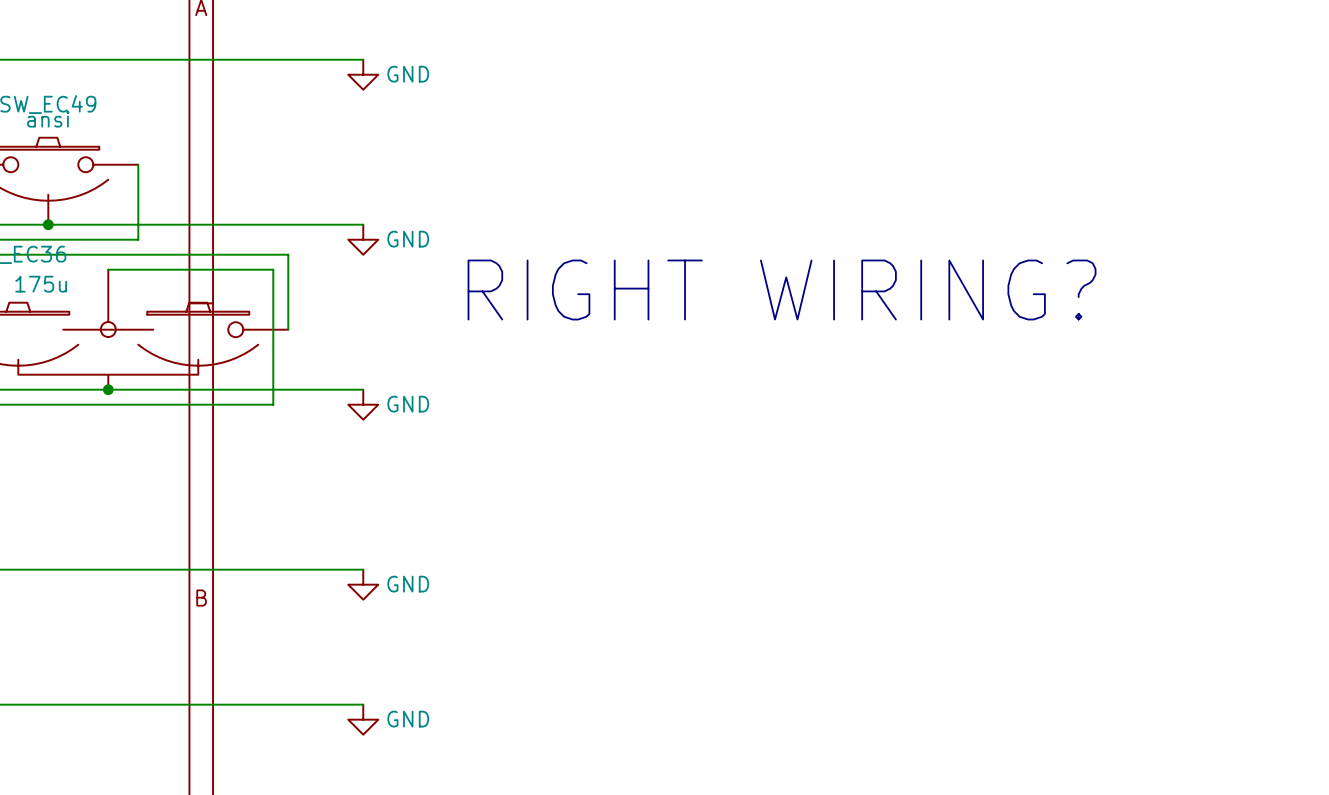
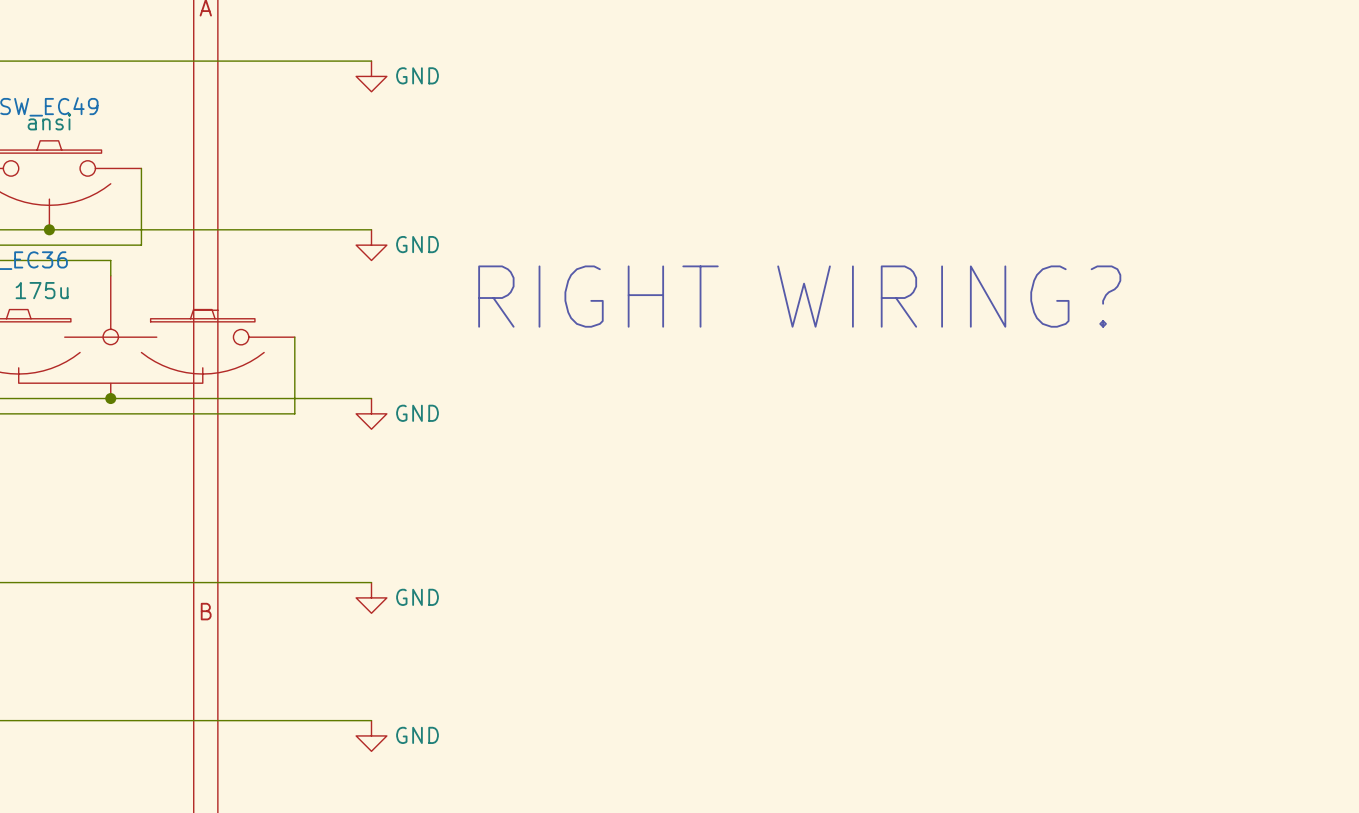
wire: (108, 254) (288, 254) (288, 329) -> (110, 260) (110, 275)
wire: (108, 269) (273, 269) (273, 404) -> (294, 337) (294, 413) (279, 413)

